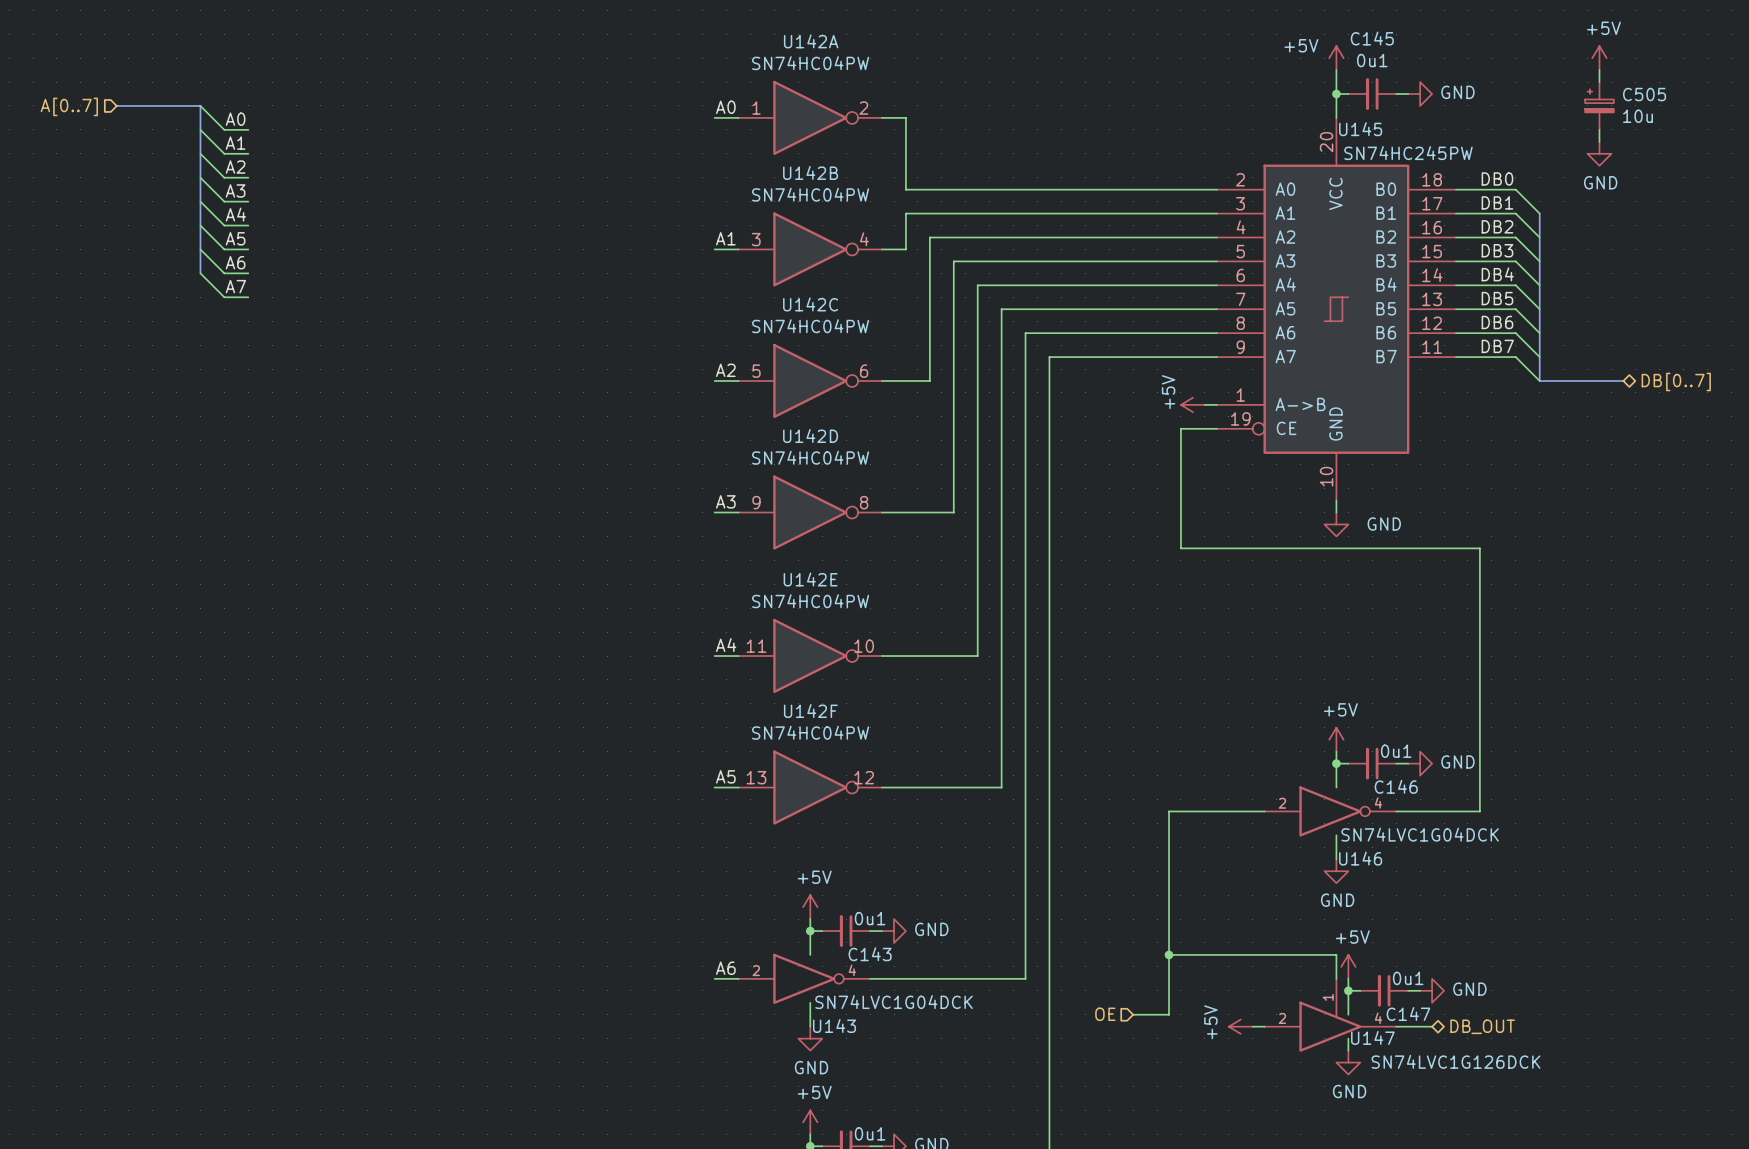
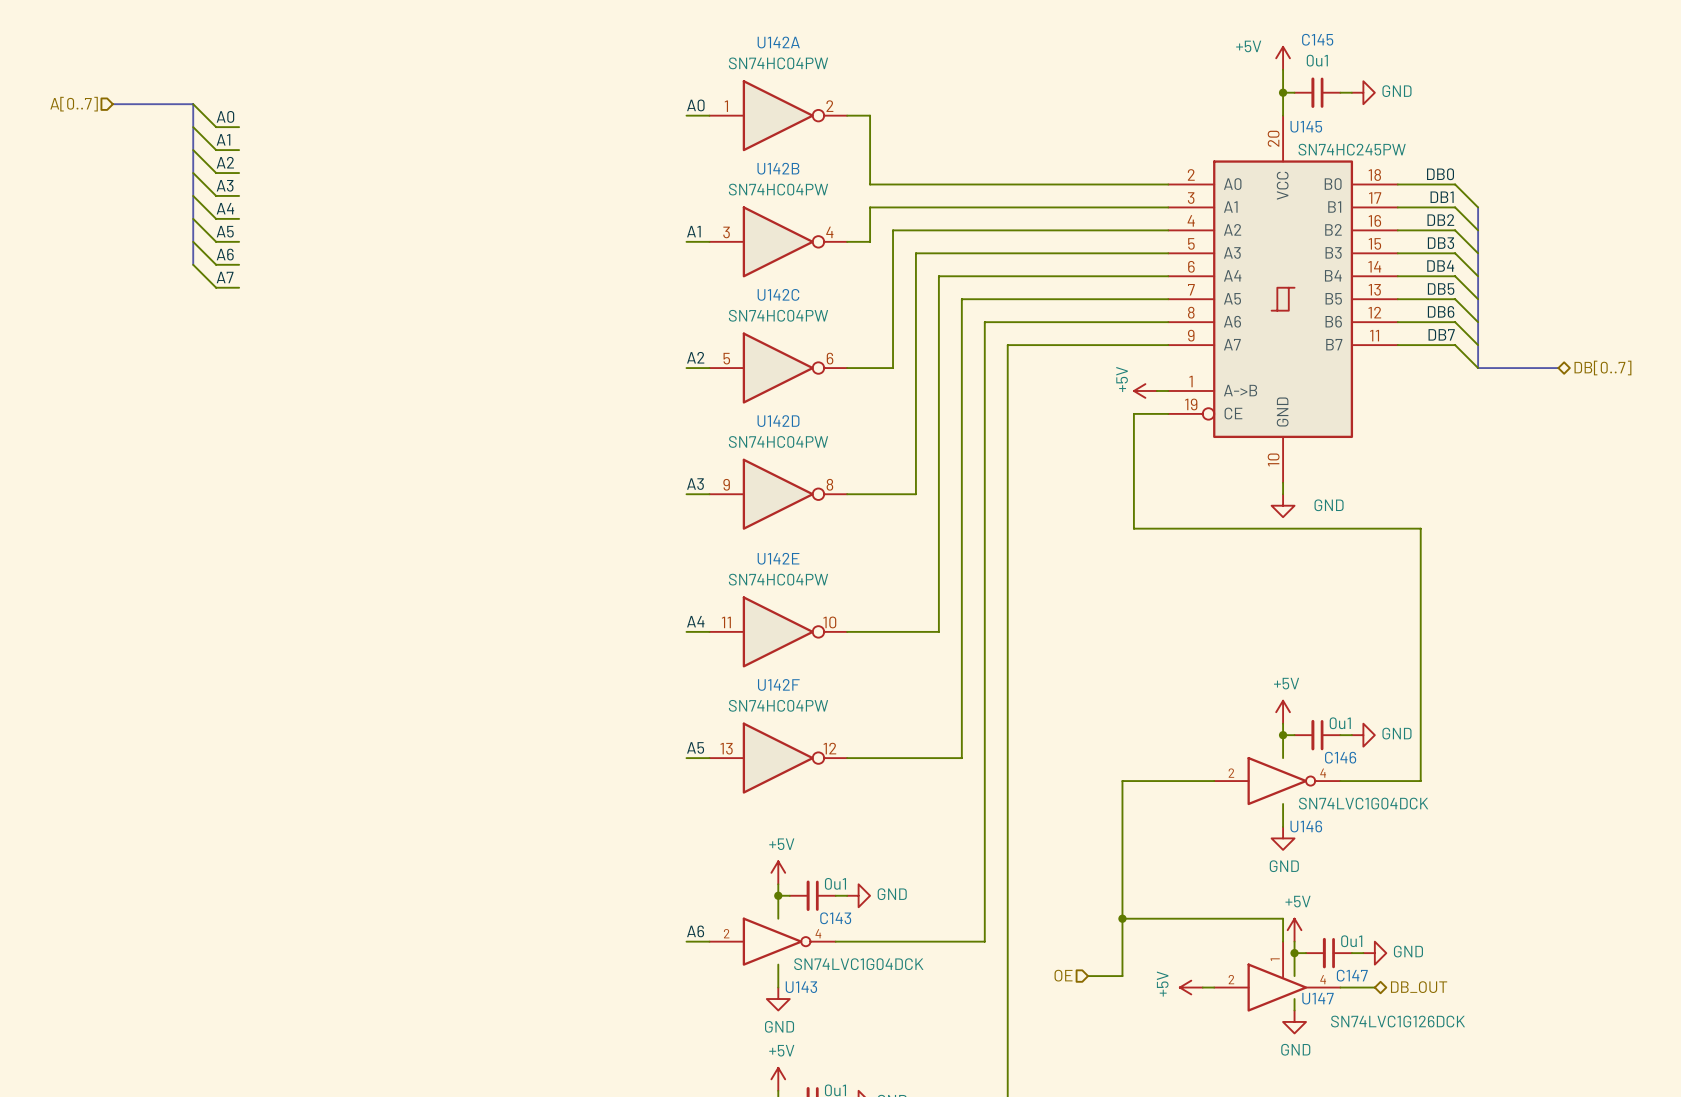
power symbol: +5V (1599, 58) -> none
wire: (1599, 70) (1599, 82) -> none
C505: 10u (1599, 105) -> none
wire: (1599, 129) (1599, 141) -> none
power symbol: GND (1599, 153) -> none

